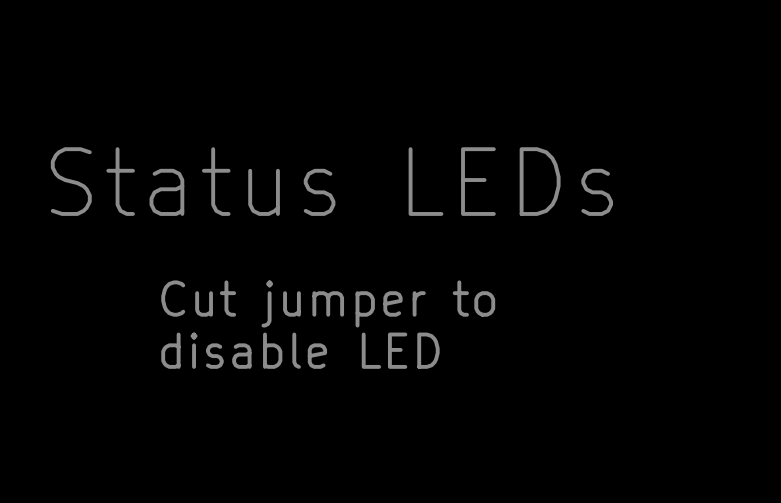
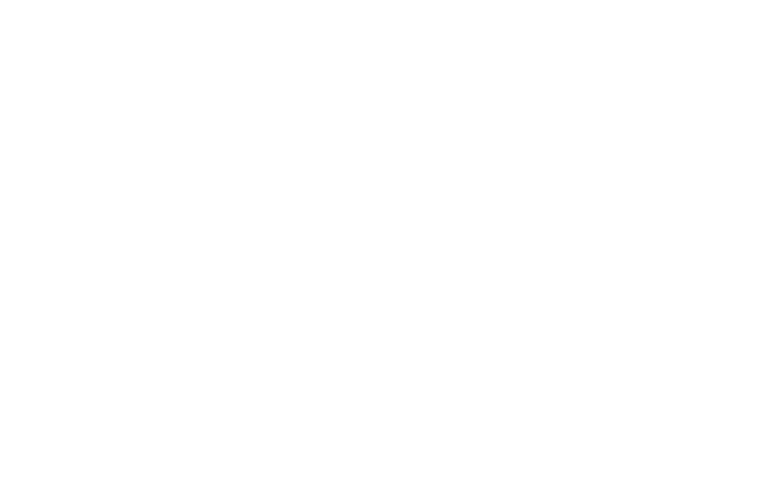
text: Status LEDs (331, 181) -> none
text: Cut jumper to (328, 303) -> none
text: disable LED (300, 350) -> none

